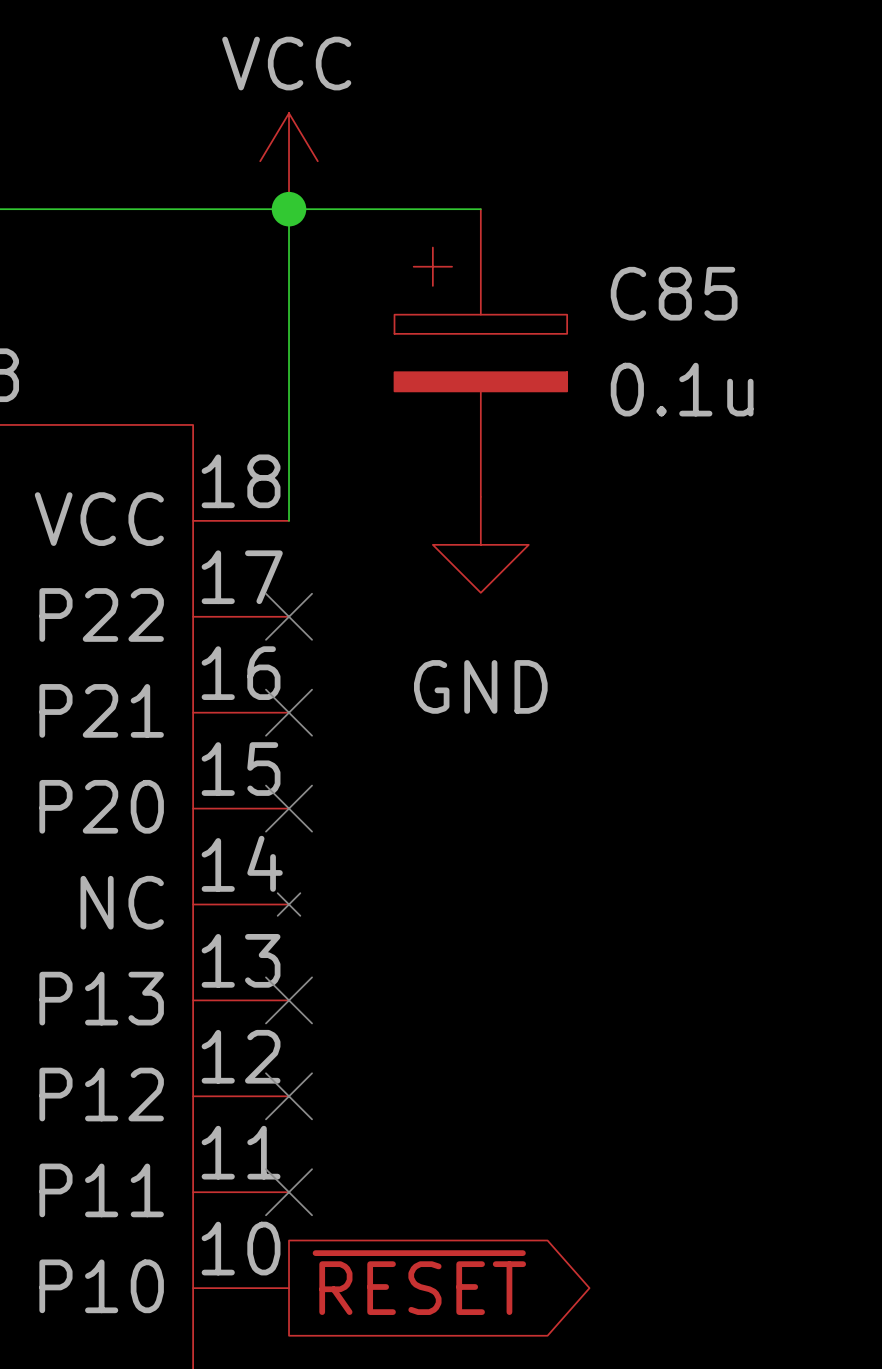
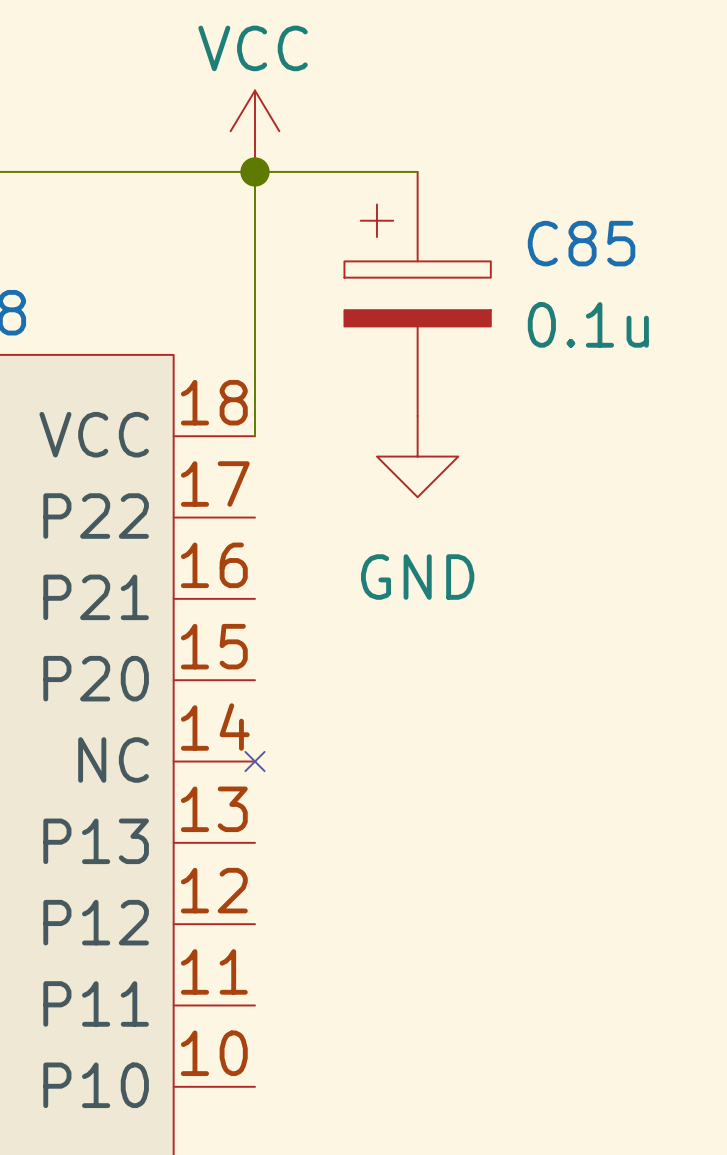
no-connect mark: (289, 616) -> none
no-connect mark: (289, 712) -> none
no-connect mark: (289, 808) -> none
no-connect mark: (289, 1000) -> none
no-connect mark: (289, 1096) -> none
no-connect mark: (289, 1192) -> none
global label: ~{RESET} (419, 1282) -> none

